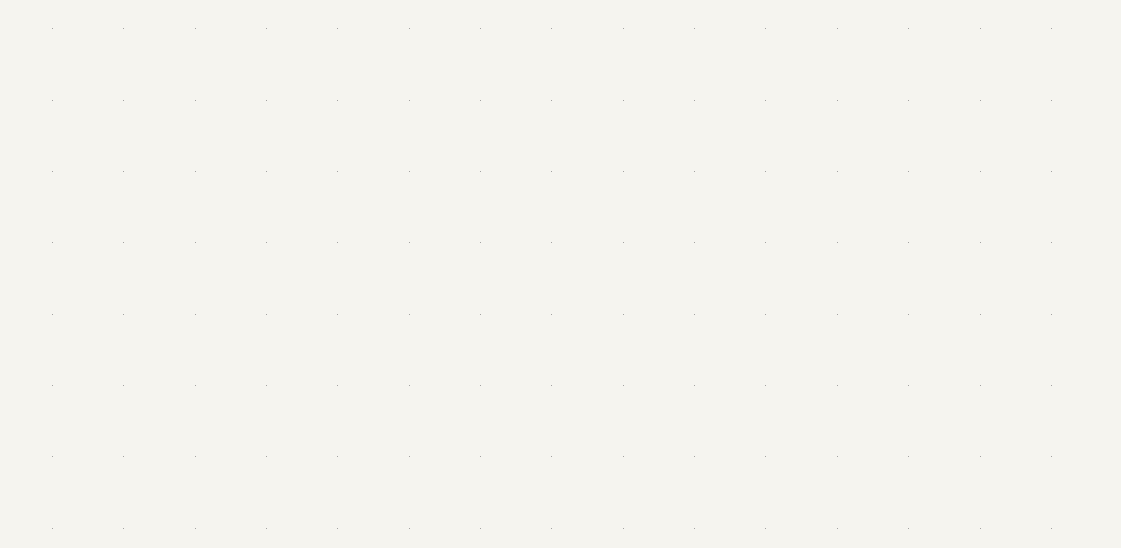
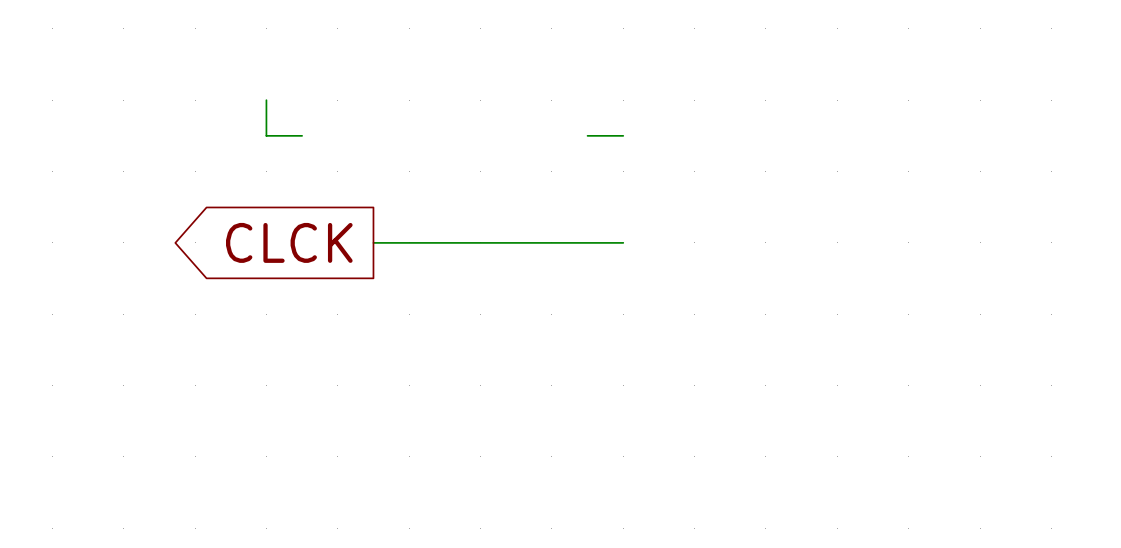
wire: none -> (266, 100) (266, 135) (302, 135)
wire: none -> (587, 135) (623, 135)
global label: none -> CLCK (289, 242)
wire: none -> (373, 242) (623, 242)

